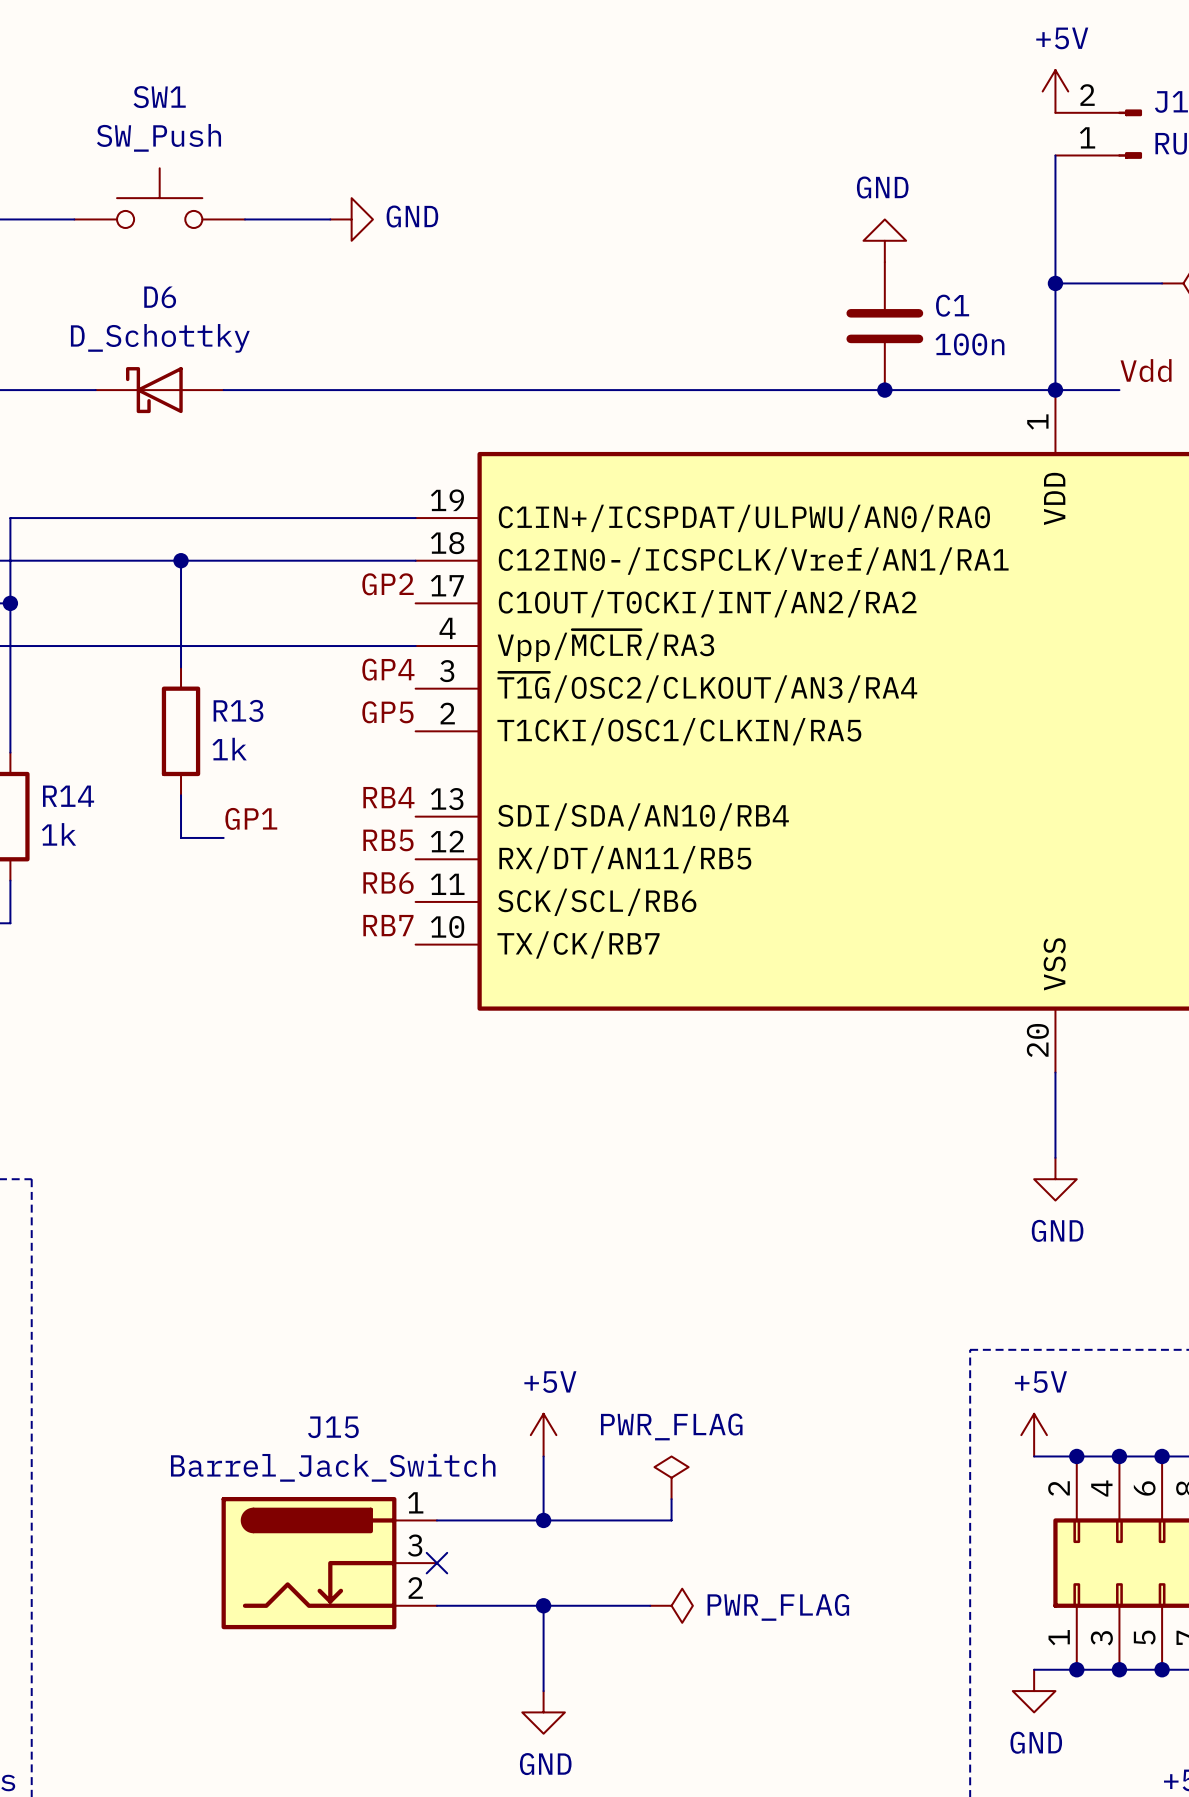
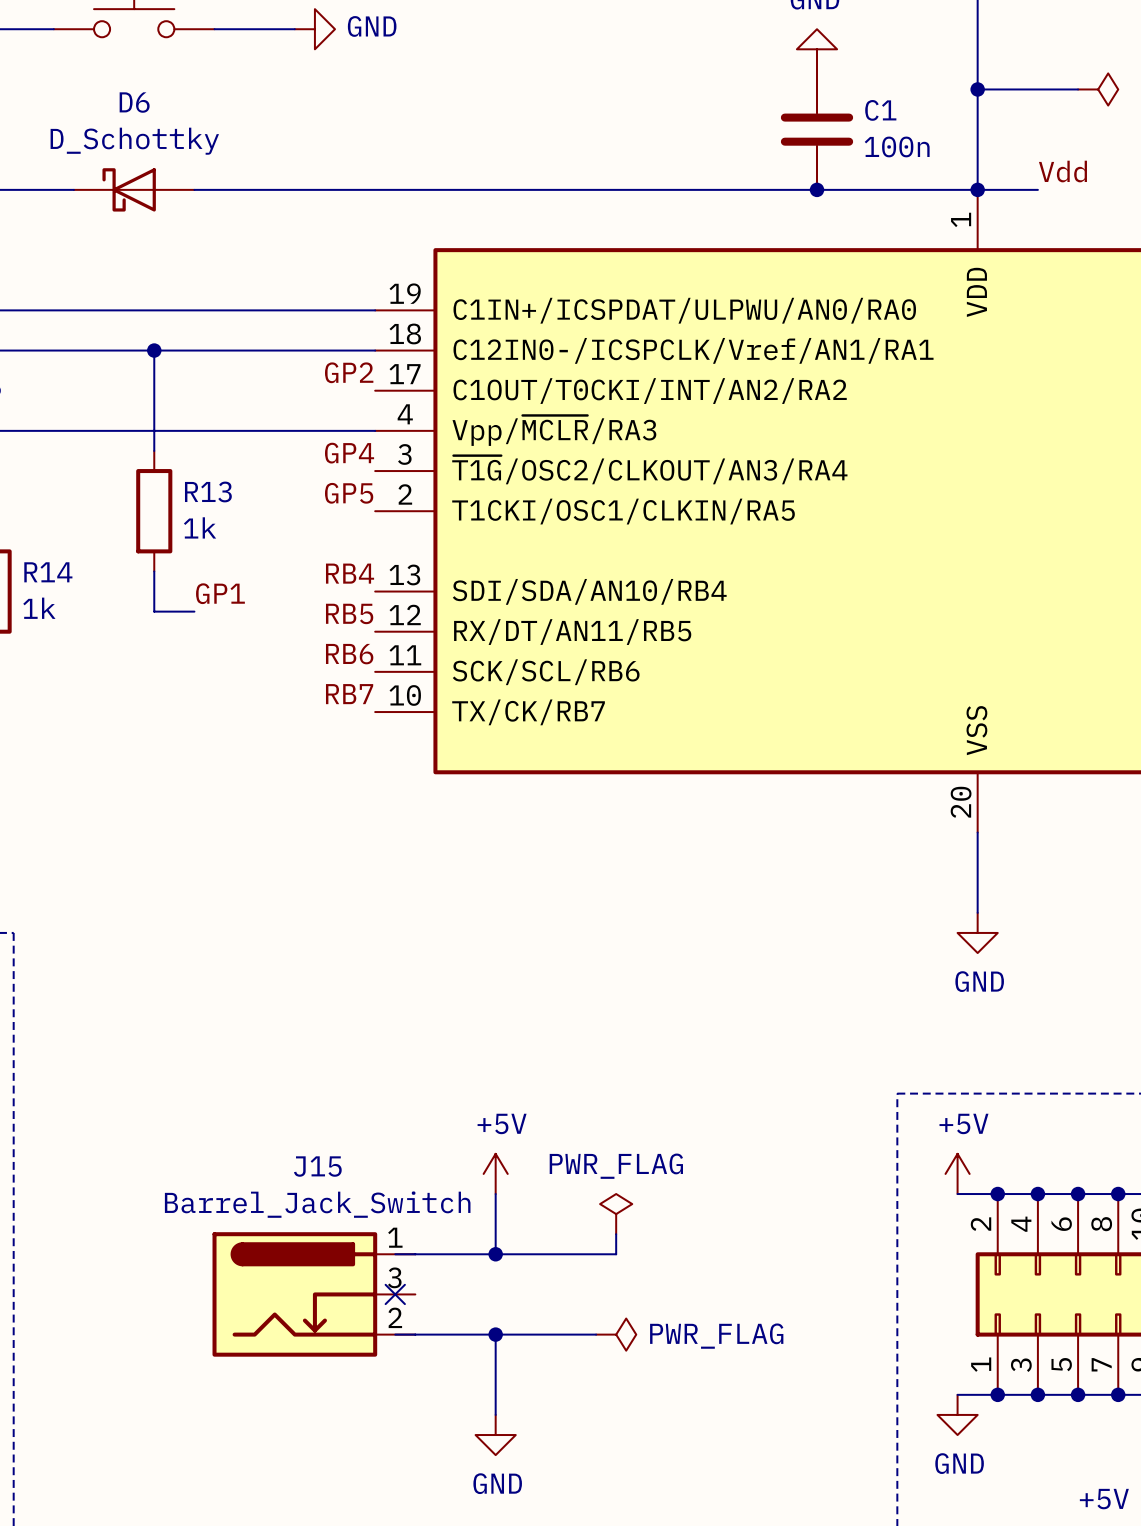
J15 position: (329, 1563) -> (313, 1294)

